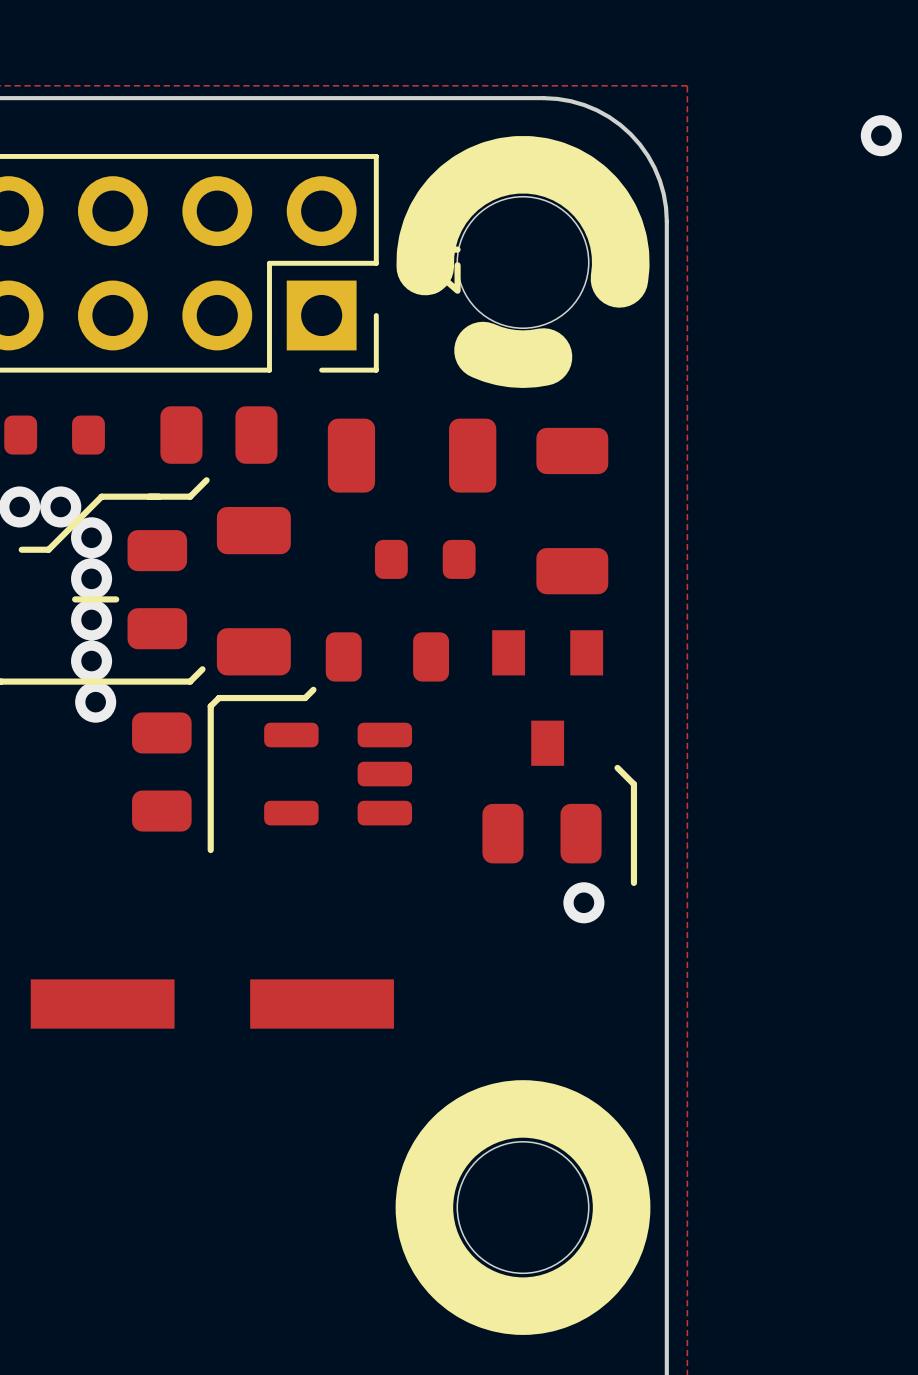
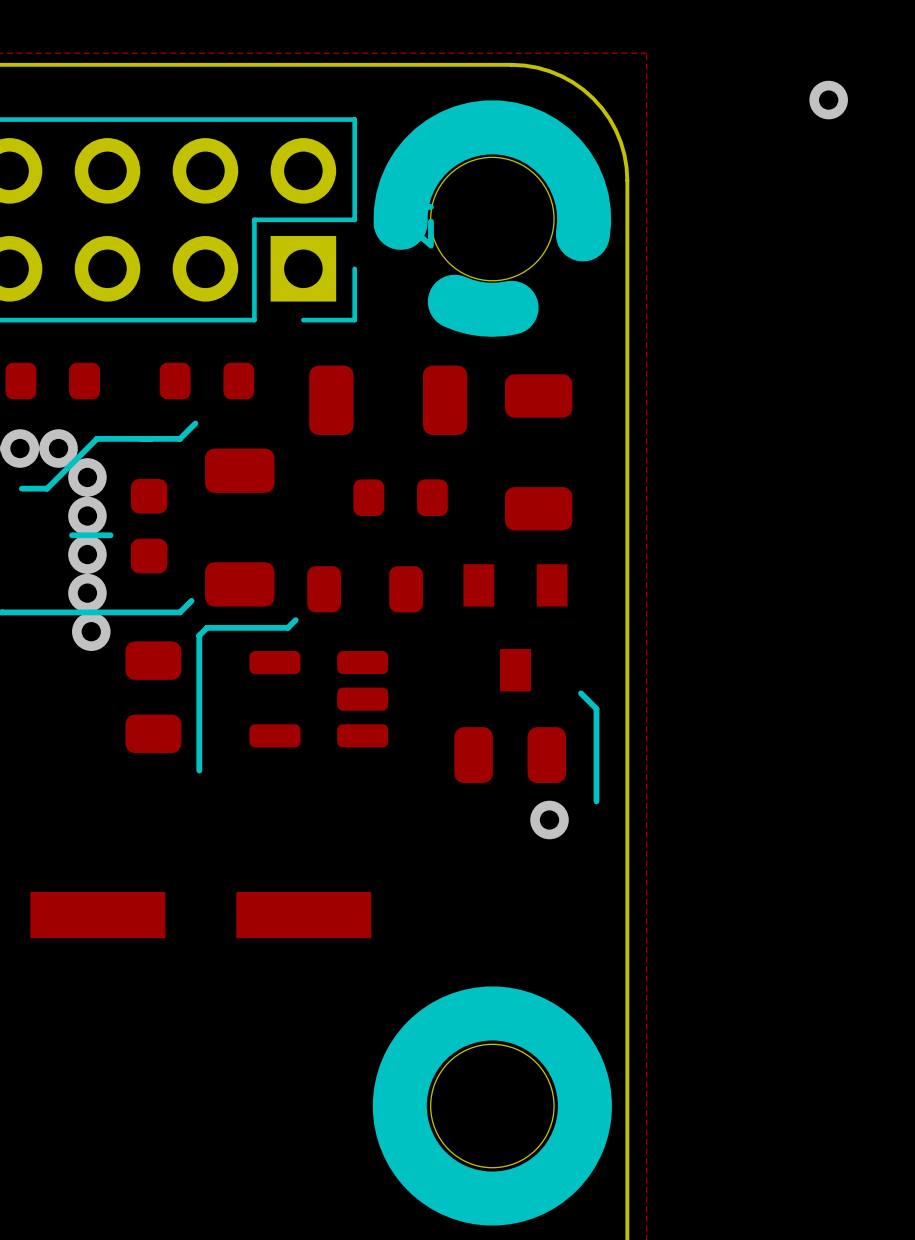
part footprint: [160, 406, 278, 464] -> [159, 362, 255, 400]
part footprint: [127, 530, 188, 650] -> [130, 478, 168, 574]

